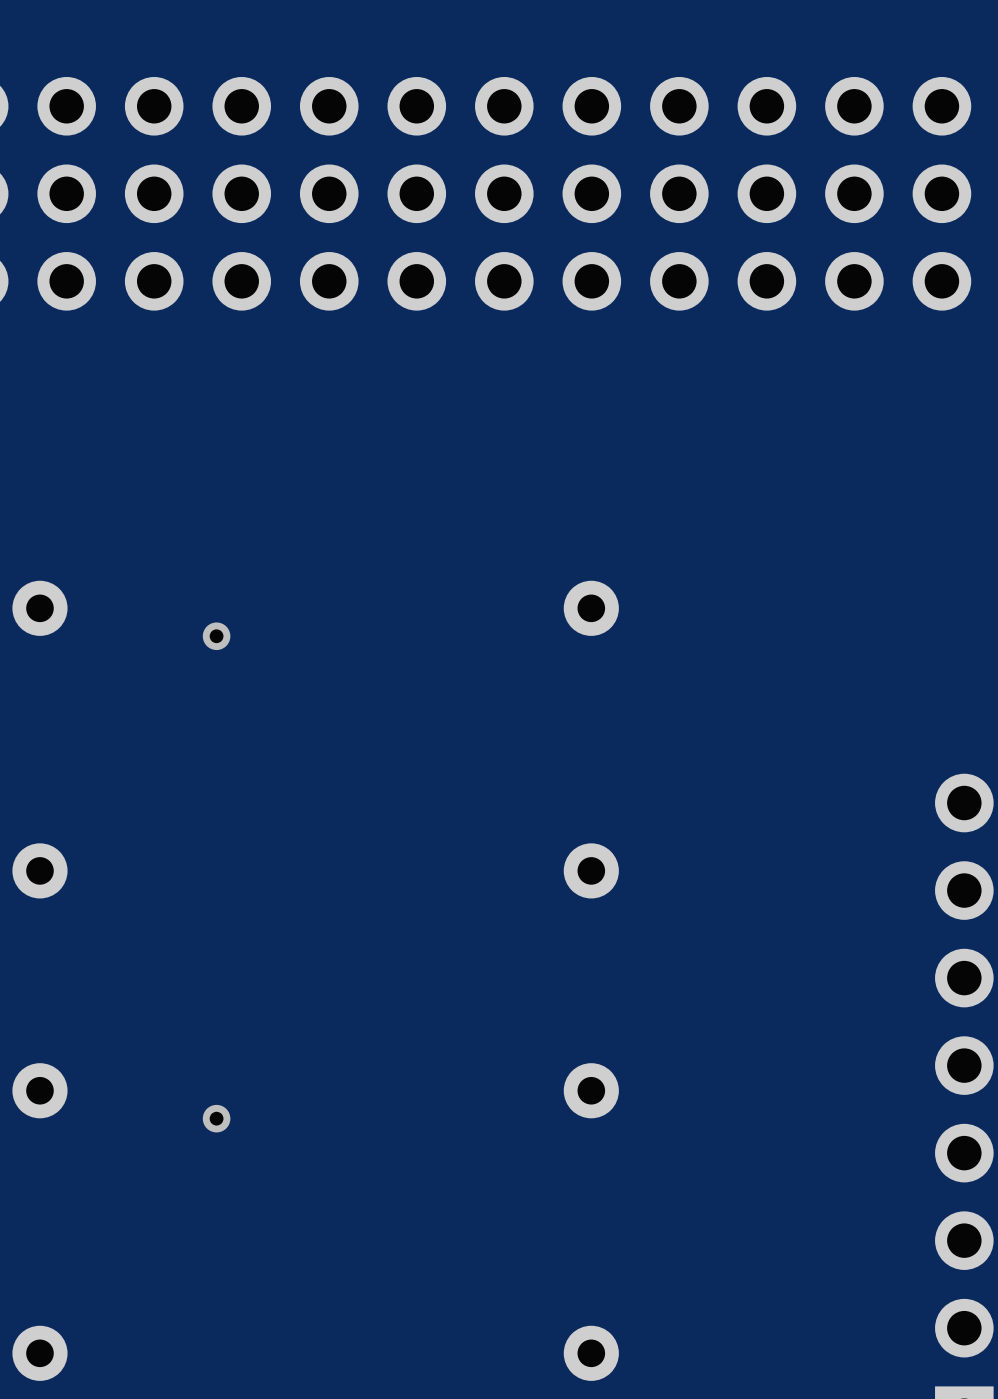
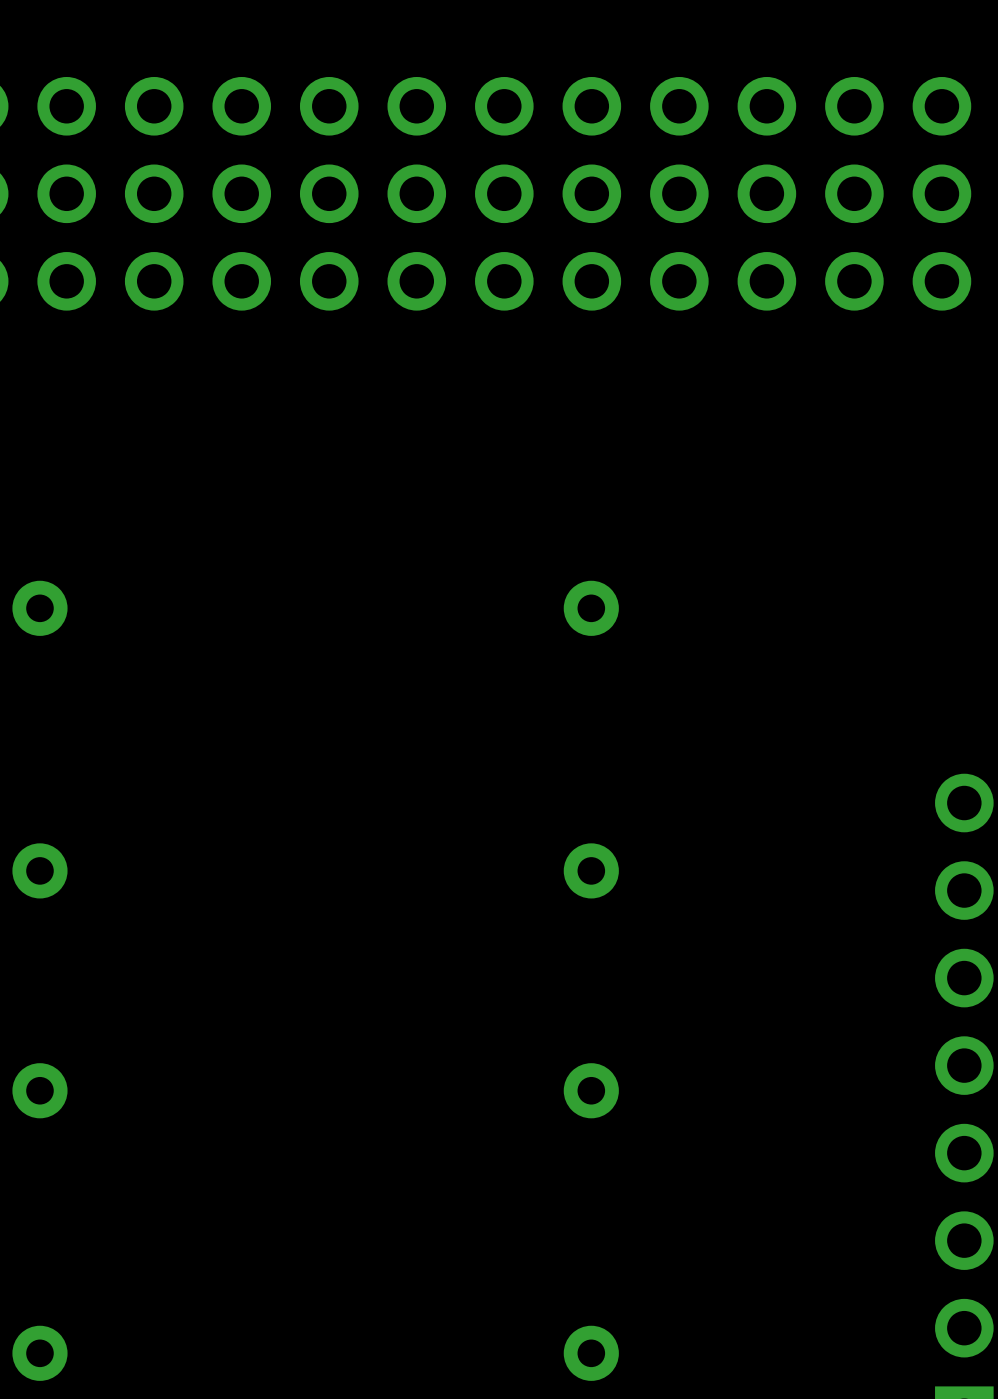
via: (216, 636) -> none
via: (216, 1118) -> none

